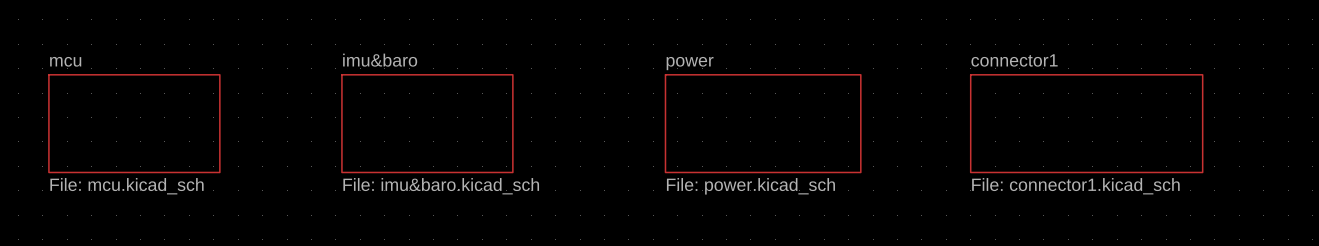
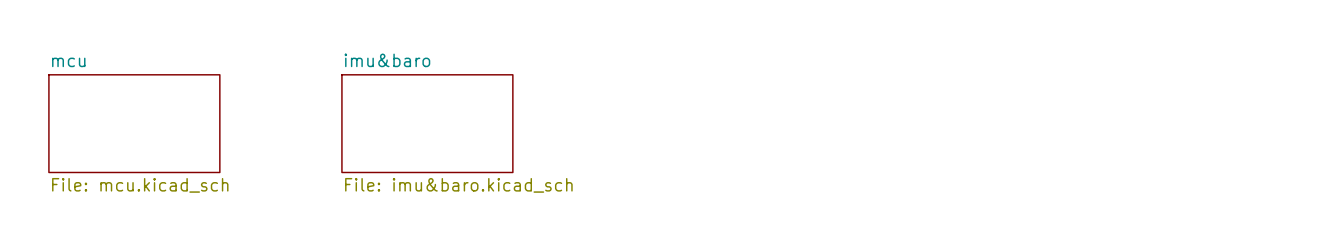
sheet power: File: power.kicad_sch (763, 123) -> none
sheet connector1: File: connector1.kicad_sch (1086, 123) -> none

